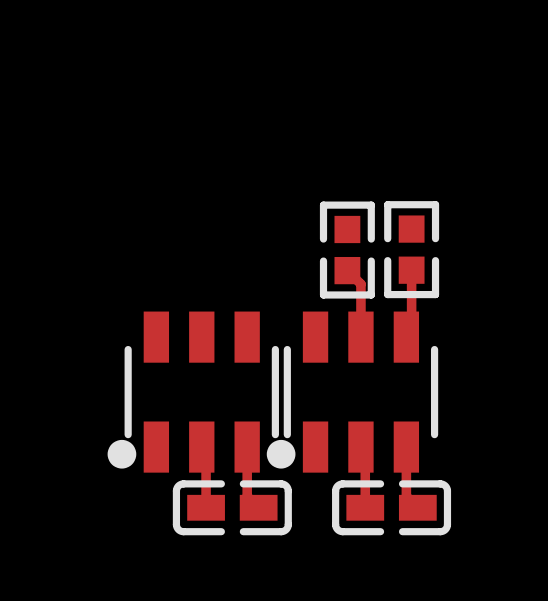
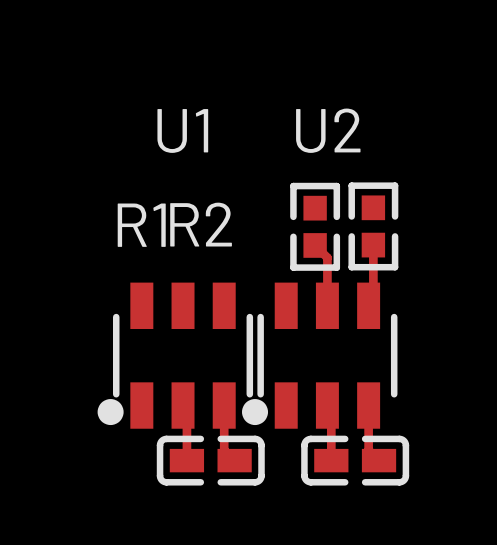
U1 name: none -> U1 (182, 130)
U2 name: none -> U2 (328, 130)
R2 name: none -> R2 (201, 224)
R1 name: none -> R1 (141, 225)

